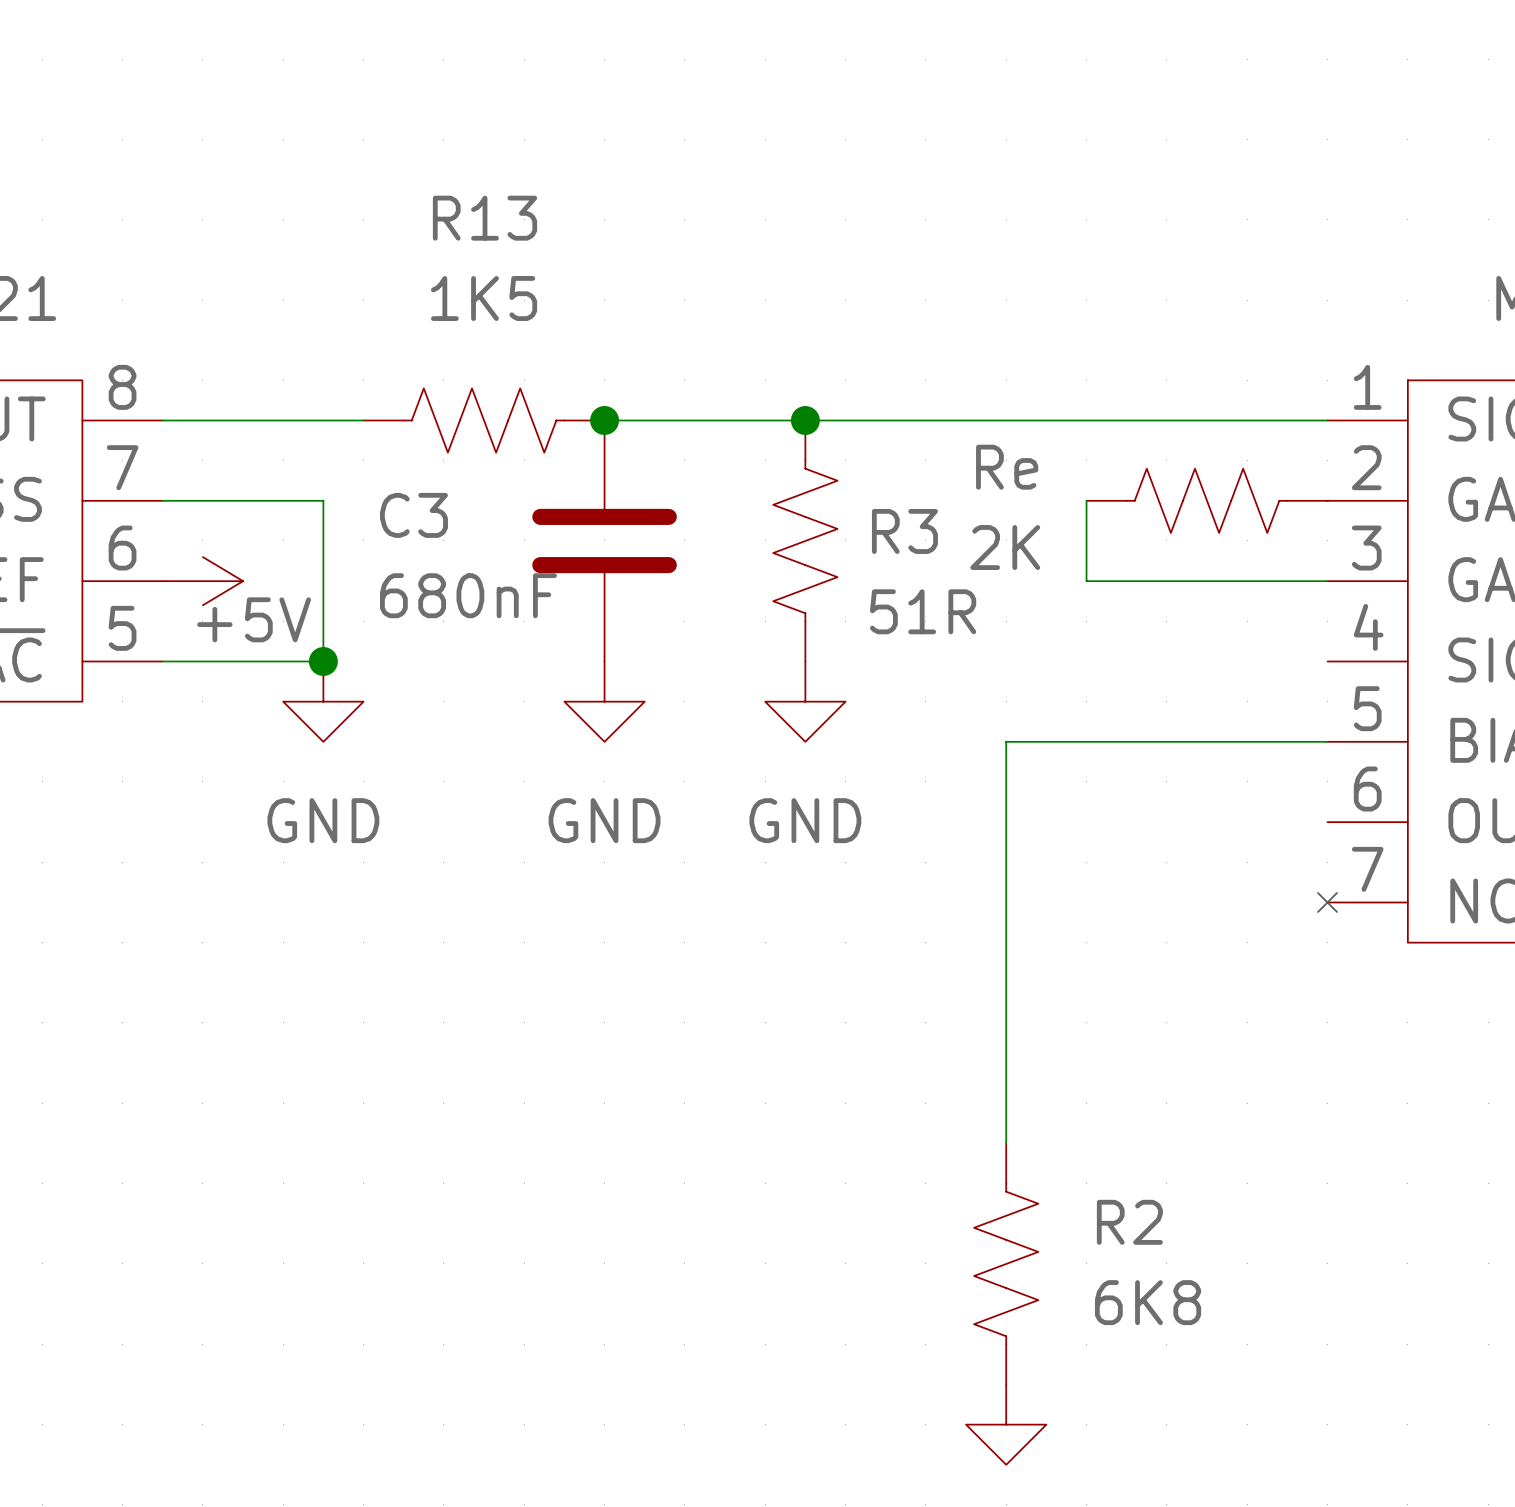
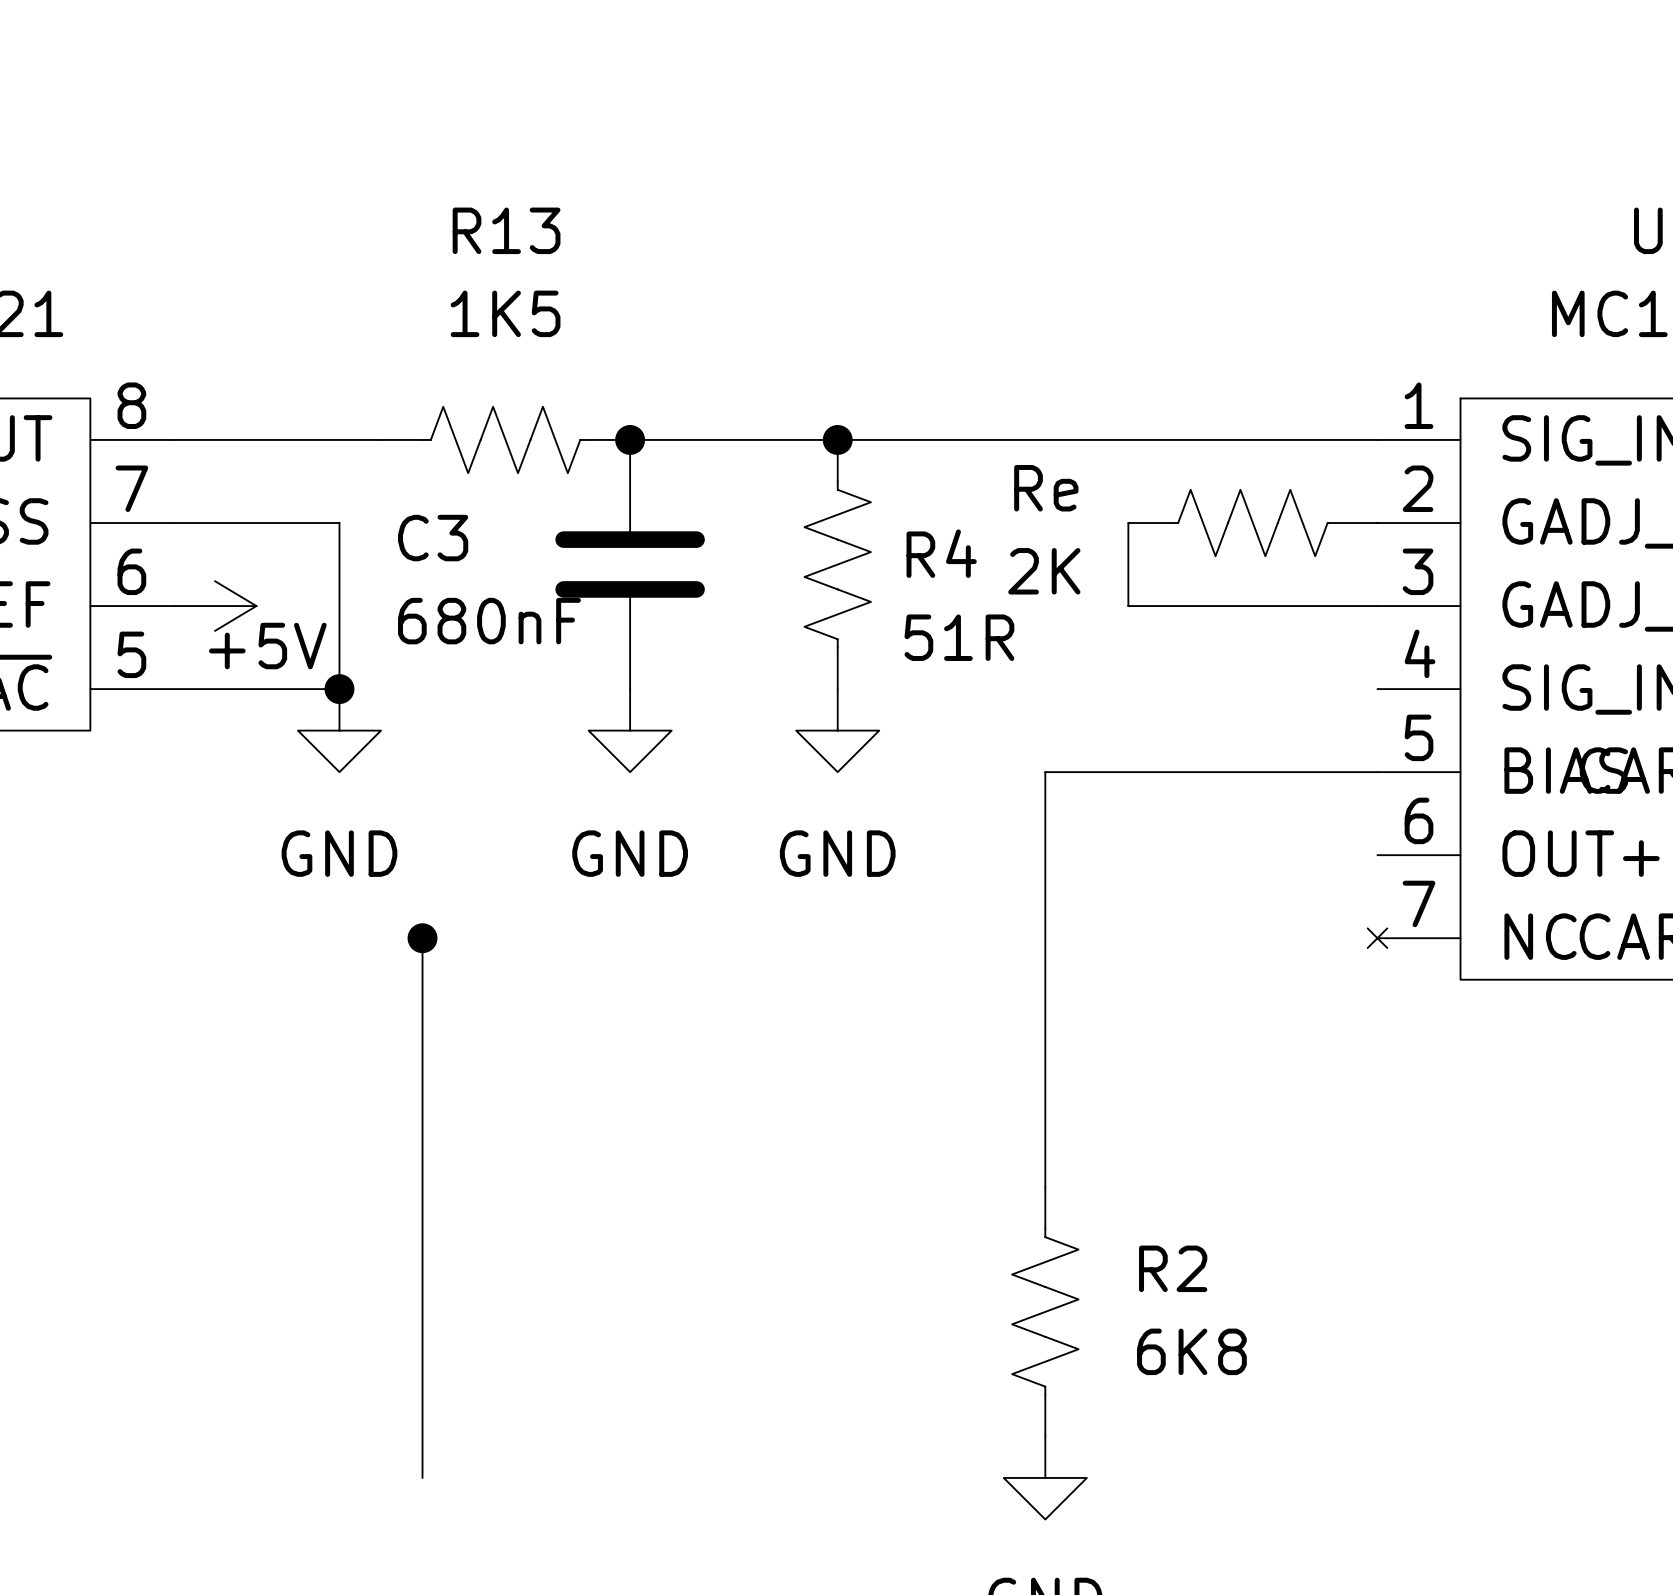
R3 name: R3 (904, 531) -> R4 (941, 553)
wire: none -> (422, 938) (422, 1477)
junction: none -> (422, 938)

